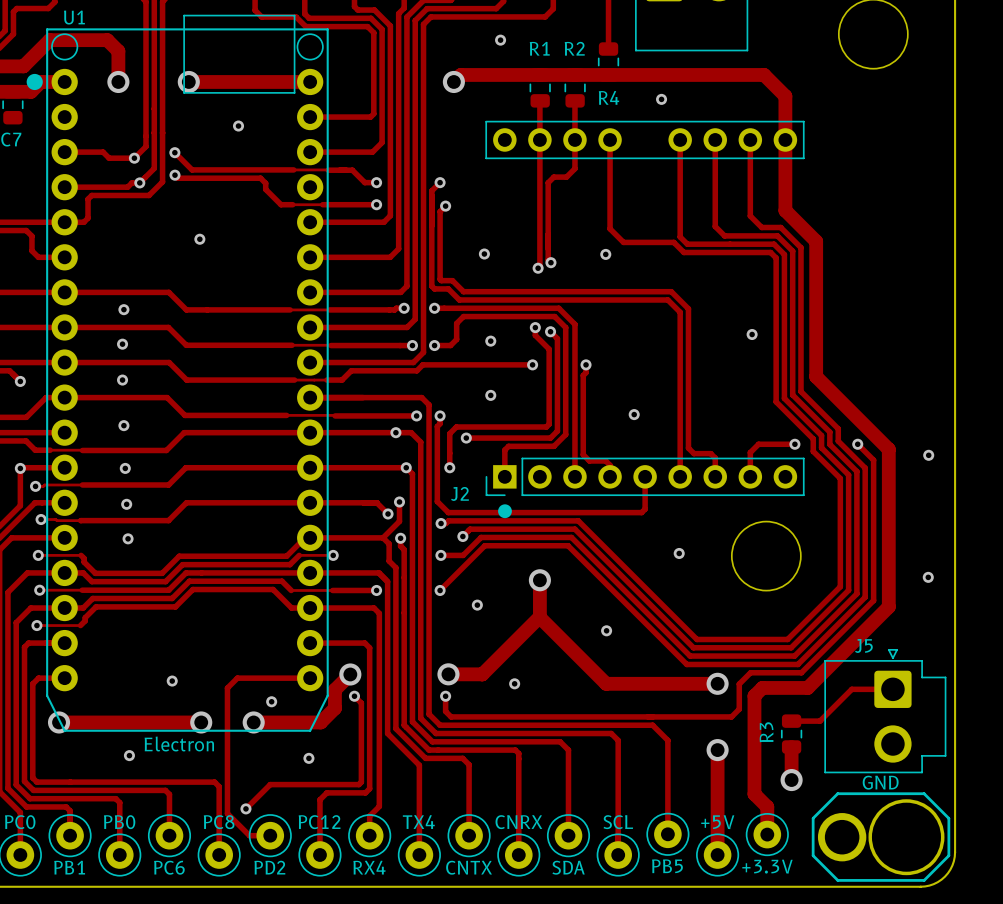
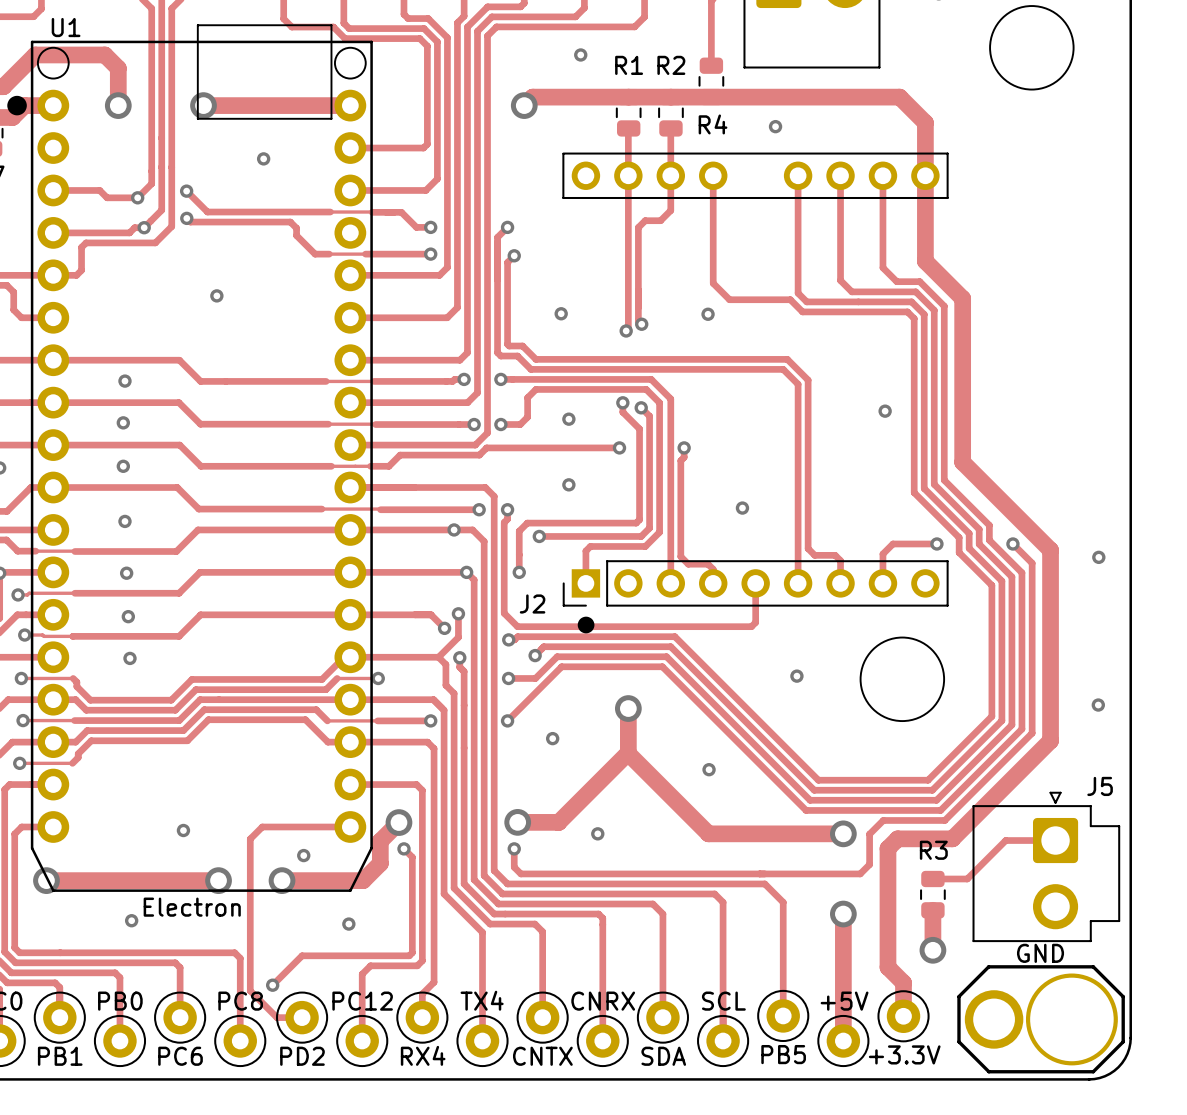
J5 name position: J5 (863, 645) -> J5 (1100, 786)
R3 name rotation: 0° (766, 732) -> 90° clockwise (933, 850)
R3 name position: R3 (766, 732) -> R3 (933, 850)

